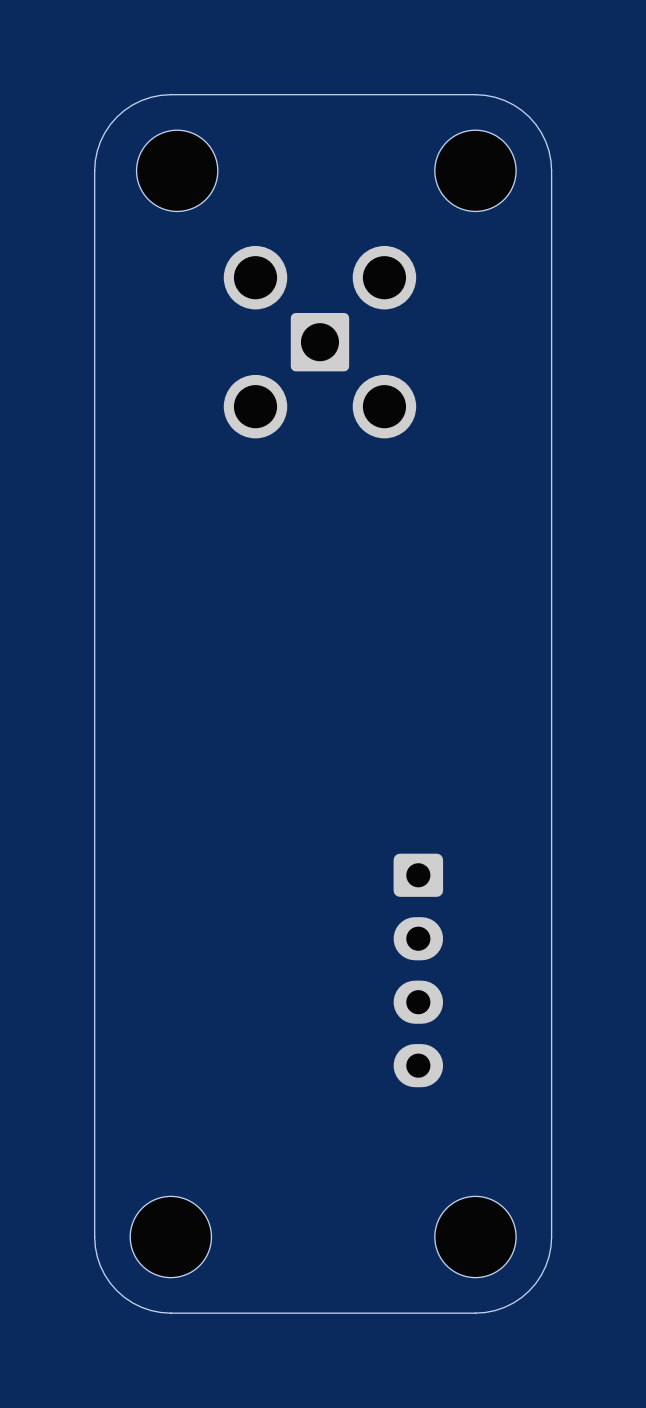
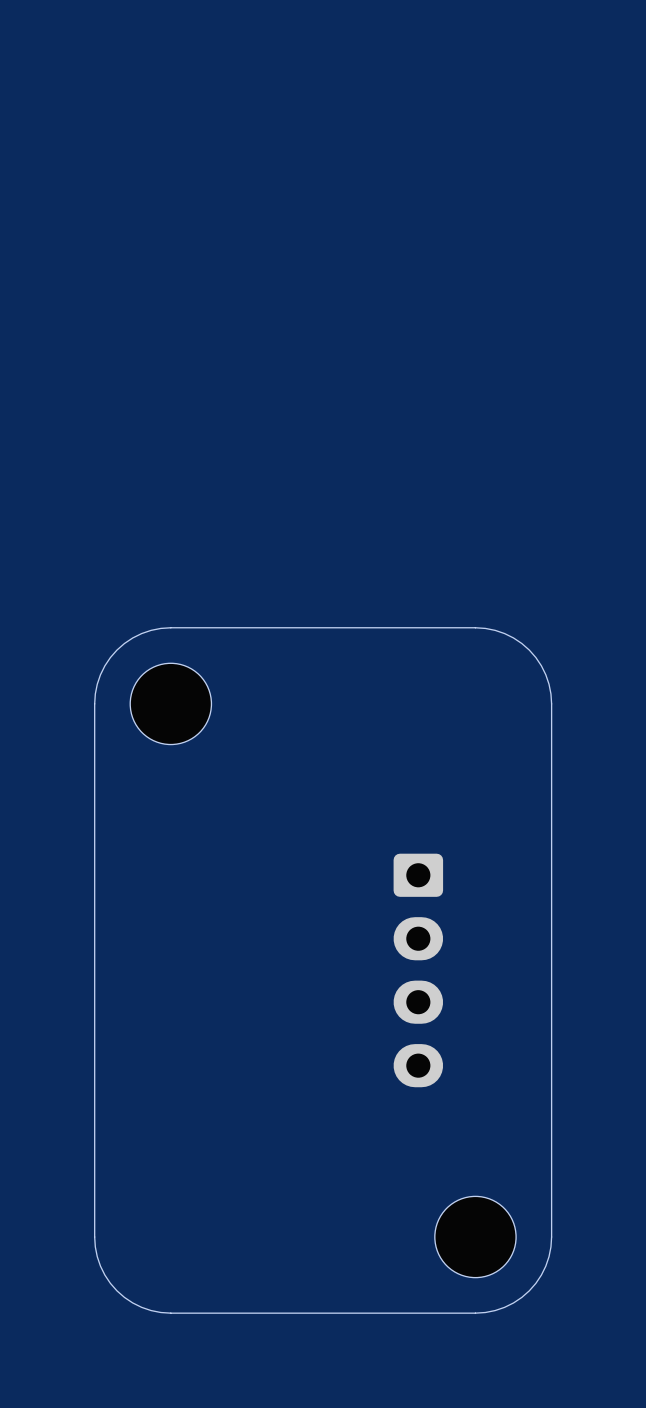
part: (177, 170) -> none
part: (475, 170) -> none
part: (319, 342) -> none
part: none -> (170, 703)
board edge: (551, 703) (550, 160) (545, 141) (529, 116) (504, 100) (475, 94) (160, 95) (141, 100) (124, 110) (104, 132) (97, 151) (94, 170) (94, 703) -> (551, 703) (545, 674) (529, 650) (504, 633) (475, 627) (170, 627) (151, 630) (124, 643) (110, 657) (97, 684) (94, 703)
part: (170, 1237) -> none

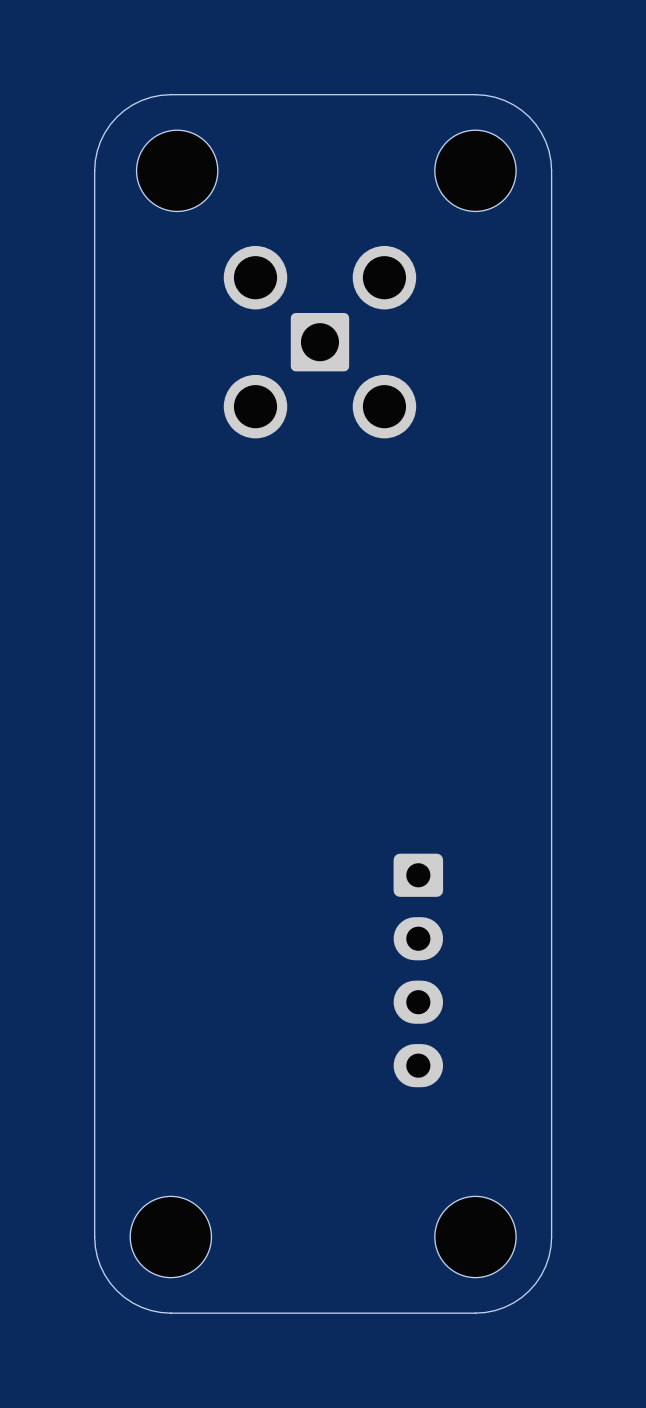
part: none -> (177, 170)
part: none -> (475, 170)
part: none -> (319, 342)
part: (170, 703) -> none
board edge: (551, 703) (545, 674) (529, 650) (504, 633) (475, 627) (170, 627) (151, 630) (124, 643) (110, 657) (97, 684) (94, 703) -> (551, 703) (550, 160) (545, 141) (529, 116) (504, 100) (475, 94) (160, 95) (141, 100) (124, 110) (104, 132) (97, 151) (94, 170) (94, 703)
part: none -> (170, 1237)

